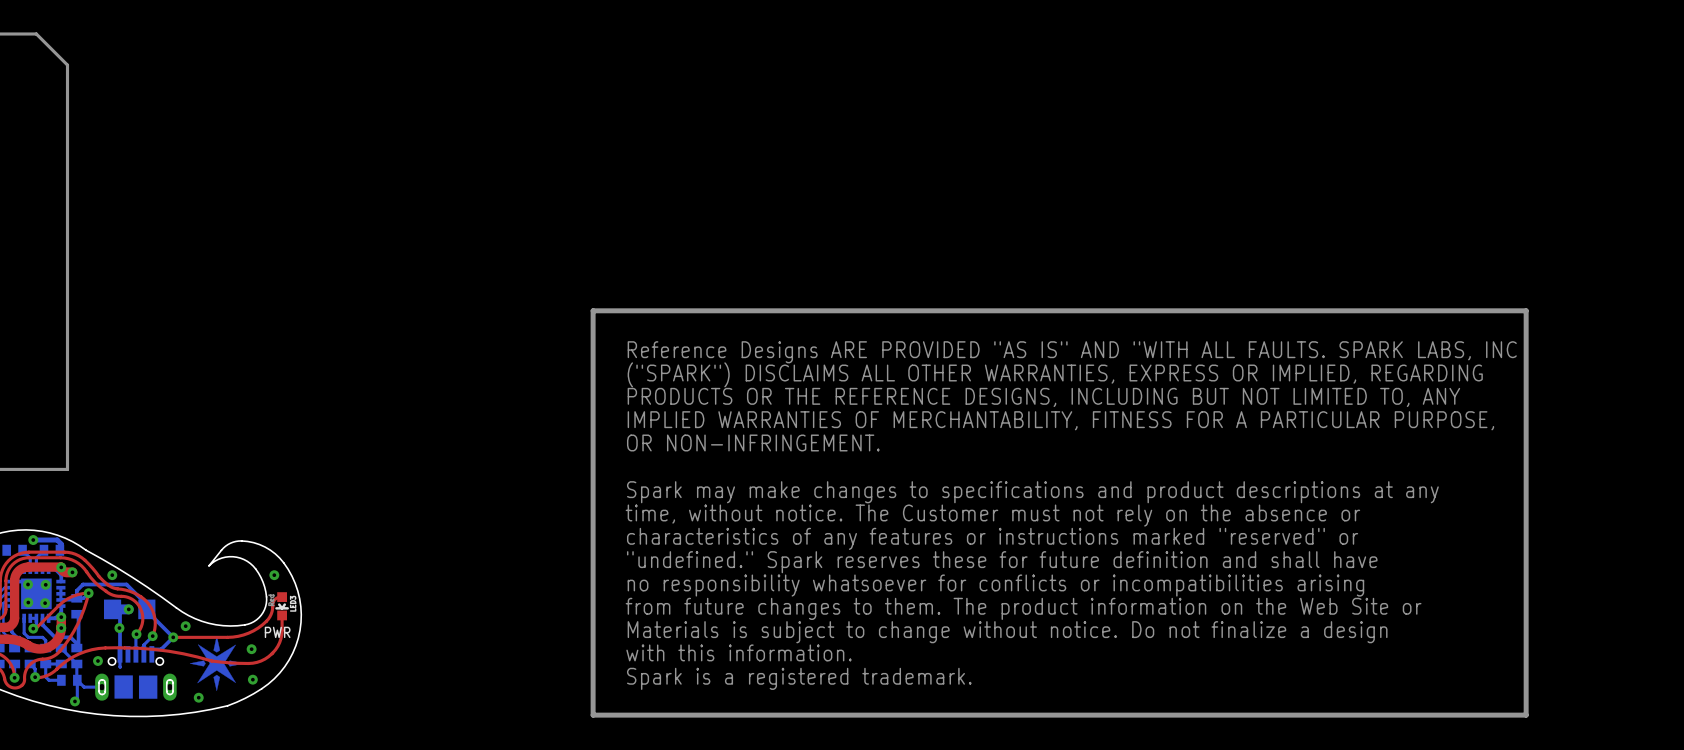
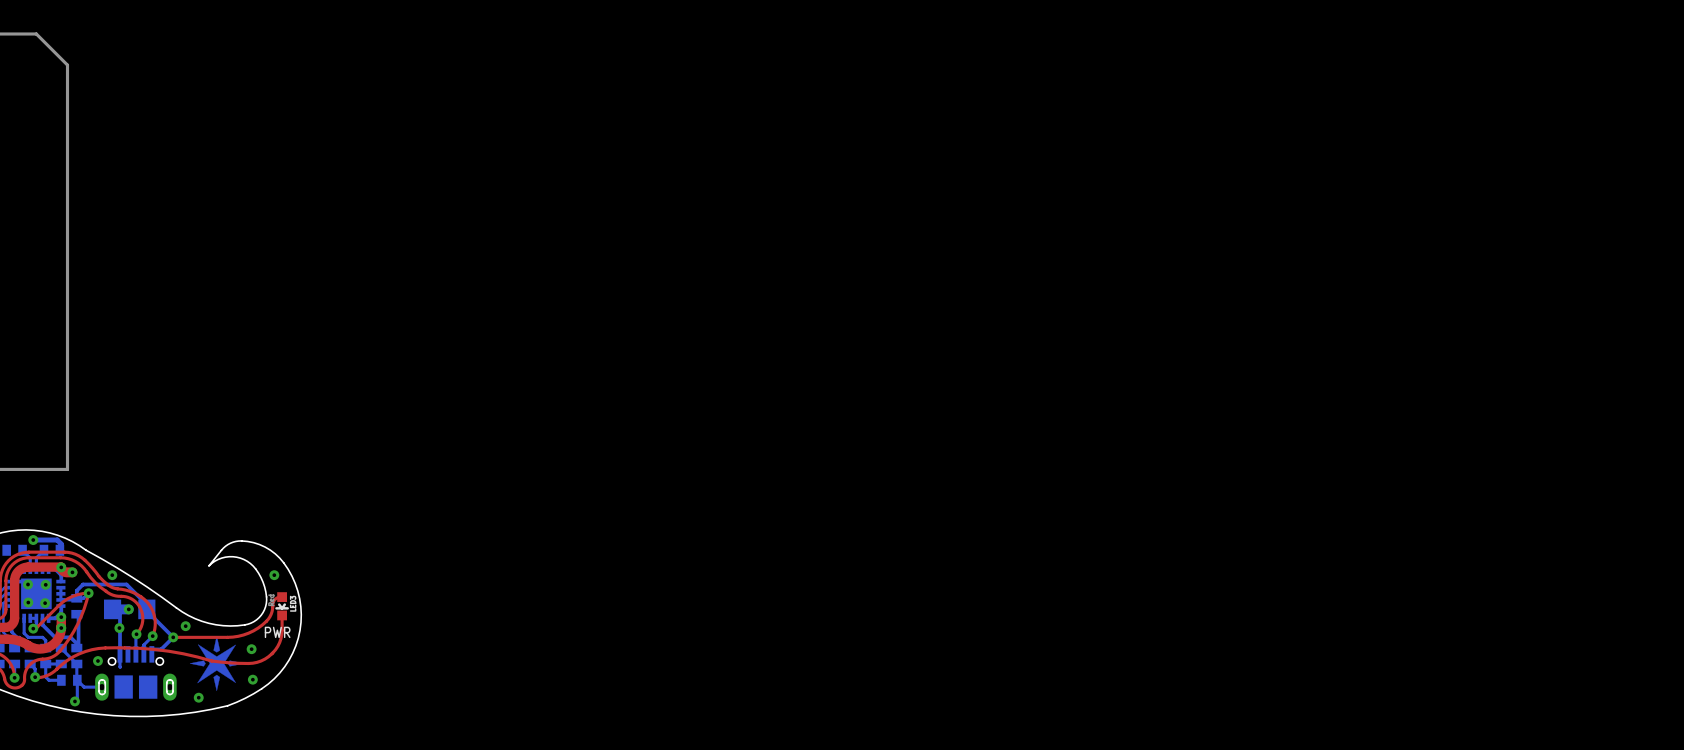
line: (593, 310) (593, 715) (1526, 715) (1526, 310) (593, 310) -> none
text: Reference Designs ARE PROVIDED "AS IS" AND "WITH ALL FAULTS. SPARK LABS, INC (1072, 352) -> none
text: ("SPARK") DISCLAIMS ALL OTHER WARRANTIES, EXPRESS OR IMPLIED, REGARDING (1055, 374) -> none
text: PRODUCTS OR THE REFERENCE DESIGNS, INCLUDING BUT NOT LIMITED TO, ANY (1043, 397) -> none
text: IMPLIED WARRANTIES OF MERCHANTABILITY, FITNESS FOR A PARTICULAR PURPOSE, (1060, 420) -> none
text: OR NON-INFRINGEMENT. (753, 442) -> none
text: Spark may make changes to specifications and product descriptions at any (1032, 492) -> none
text: time, without notice. The Customer must not rely on the absence or (992, 515) -> none
text: characteristics of any features or instructions marked "reserved" or (992, 538) -> none
text: "undefined." Spark reserves these for future definition and shall have (1002, 562) -> none
text: no responsibility whatsoever for conflicts or incompatibilities arising (995, 585) -> none
text: from future changes to them. The product information on the Web Site or (1023, 608) -> none
text: Materials is subject to change without notice. Do not finalize a design (1007, 632) -> none
text: with this information. (739, 652) -> none
text: Spark is a registered trademark. (799, 678) -> none

